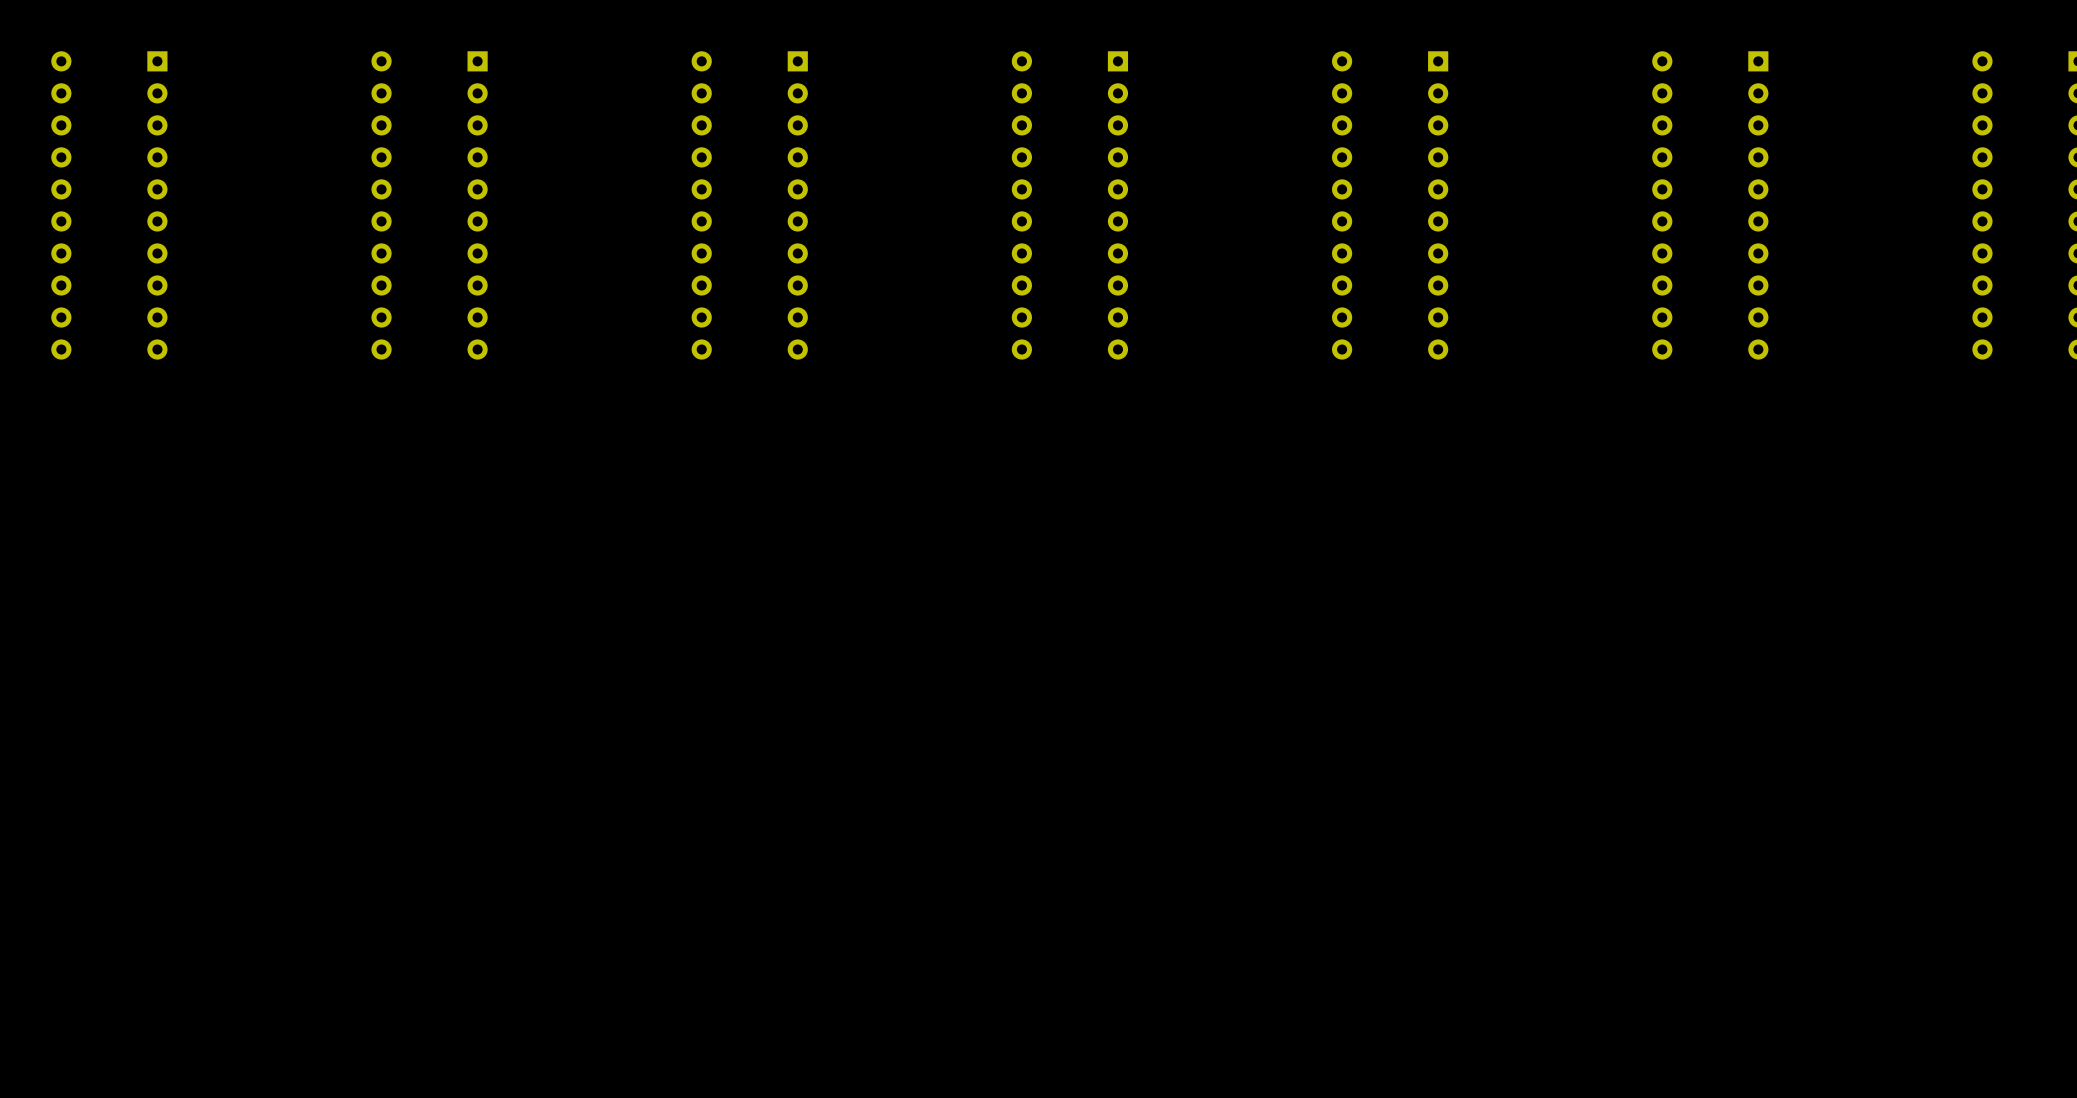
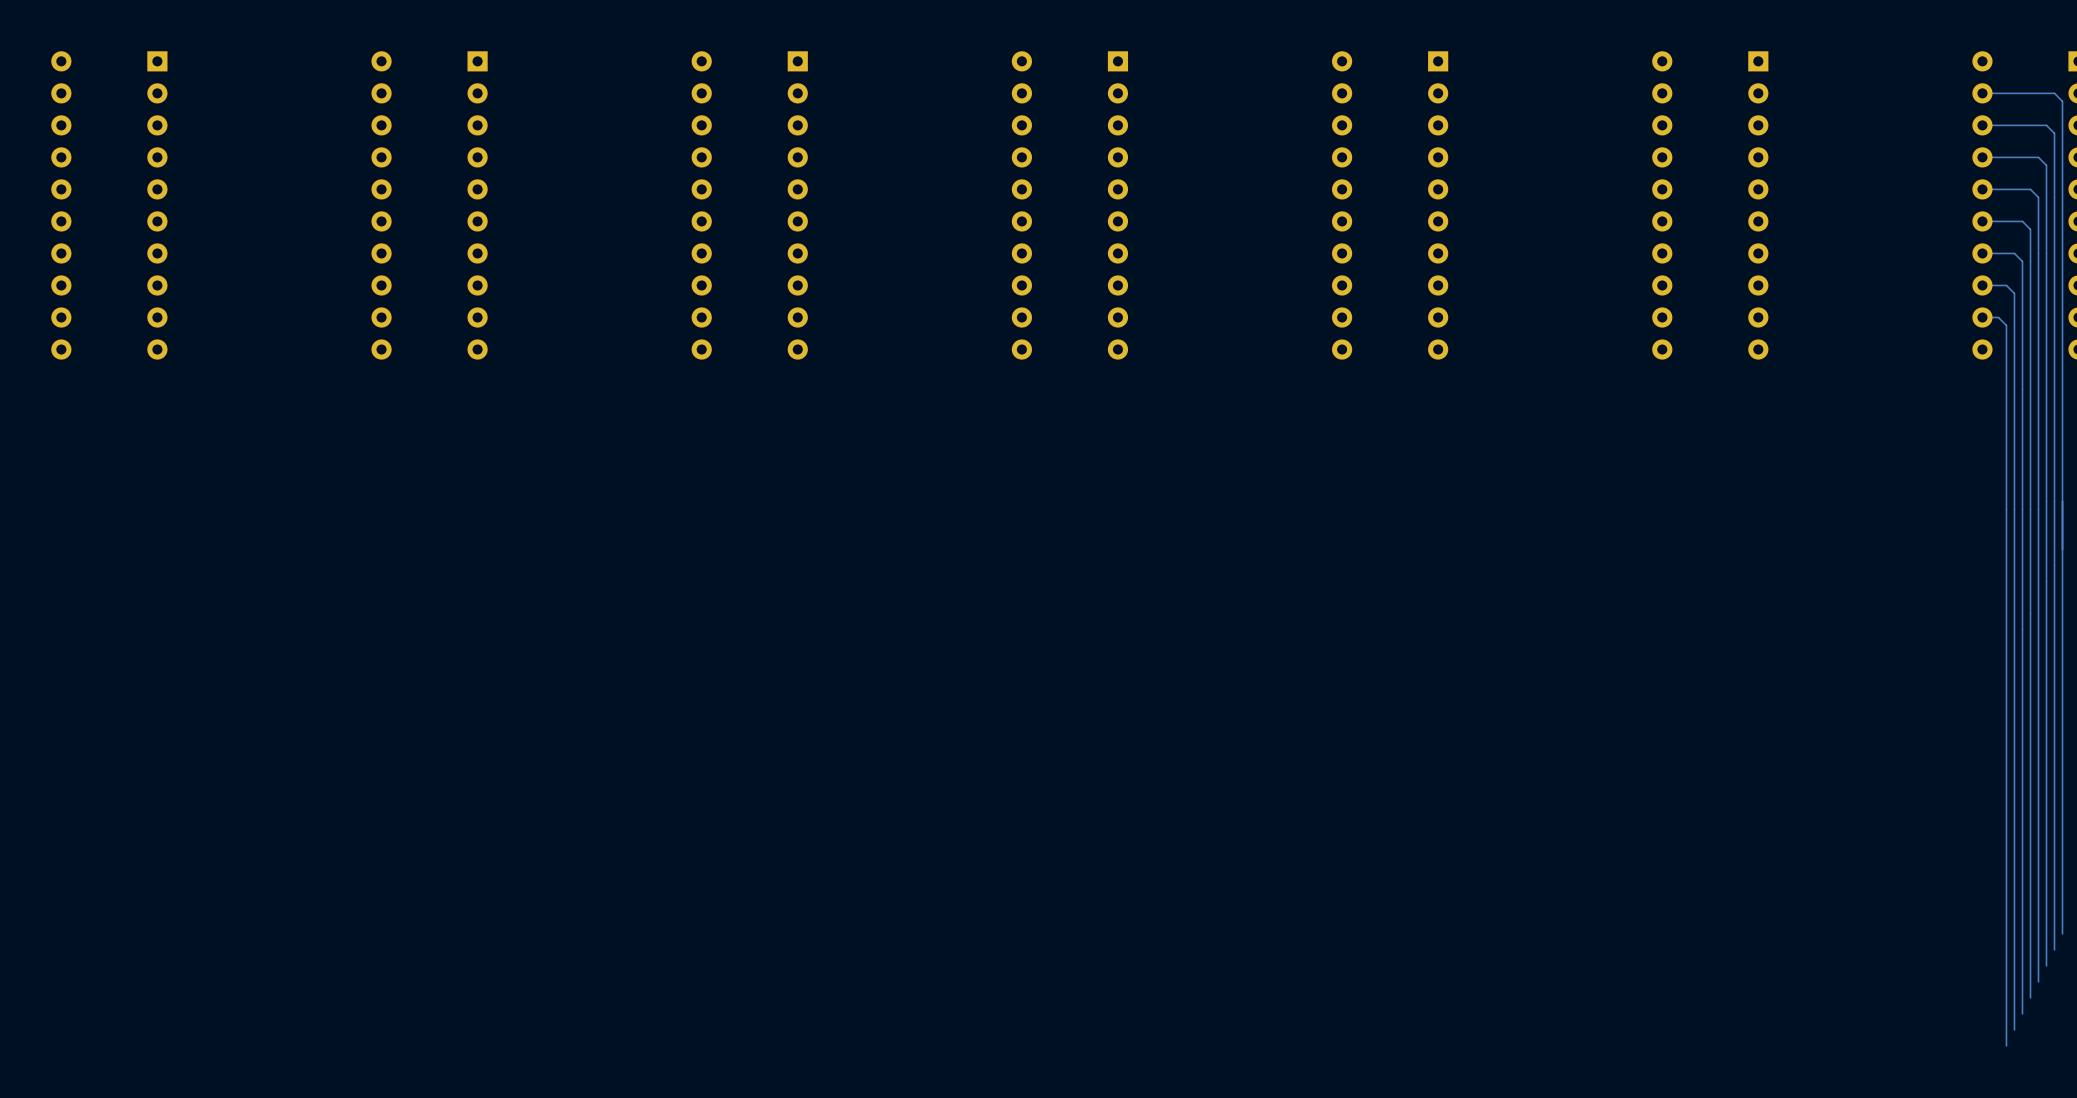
track: none -> (1982, 93) (2054, 93) (2062, 101) (2062, 933)
track: none -> (1982, 125) (2046, 125) (2054, 133) (2054, 949)
track: none -> (1982, 157) (2038, 157) (2046, 165) (2046, 965)
track: none -> (1982, 189) (2030, 189) (2038, 197) (2038, 981)
track: none -> (1982, 221) (2022, 221) (2030, 229) (2030, 997)
track: none -> (1982, 253) (2014, 253) (2022, 261) (2022, 1013)
track: none -> (1982, 285) (2006, 285) (2014, 293) (2014, 1029)
track: none -> (1982, 317) (1998, 317) (2006, 325) (2006, 1045)

